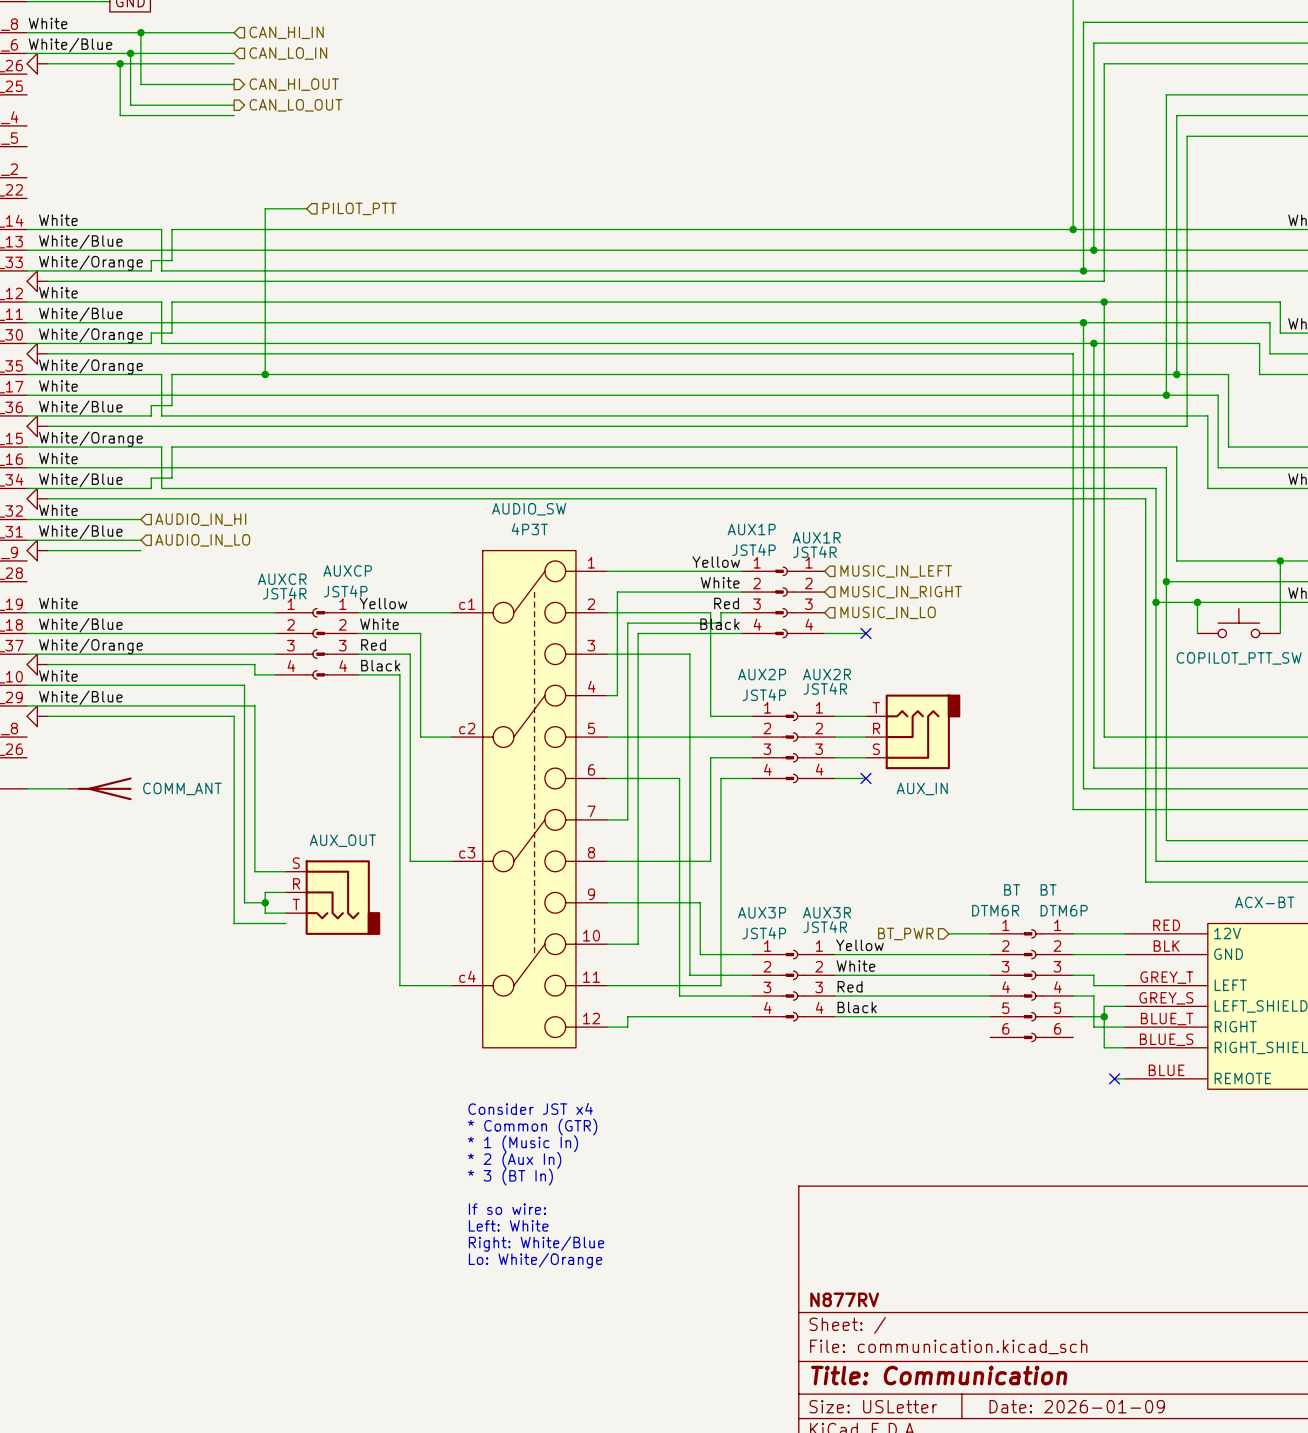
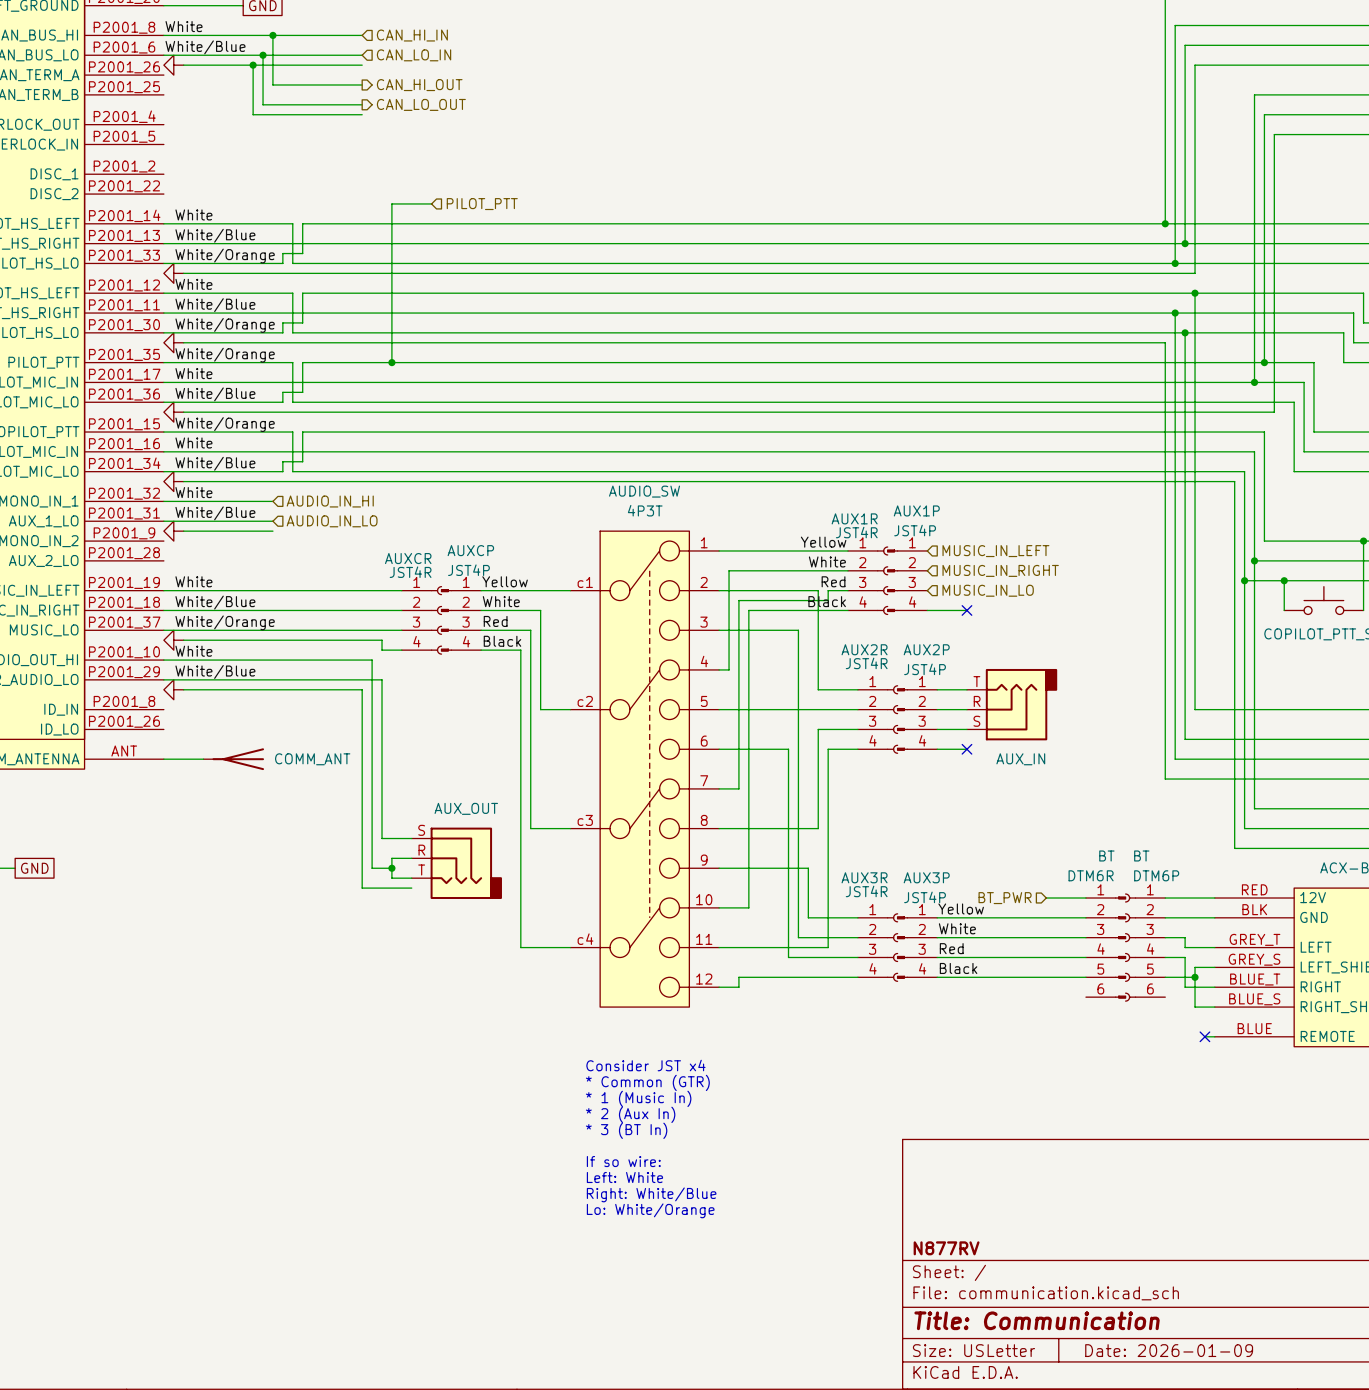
AUX1P position: (762, 602) -> (907, 580)
AUX1P flip: as is (777, 602) -> left-right (892, 580)
AUX1R flip: as is (788, 602) -> left-right (882, 580)
AUX2P position: (773, 747) -> (917, 719)
AUX2P flip: as is (788, 747) -> left-right (902, 719)
AUX2R flip: as is (798, 747) -> left-right (892, 719)
AUX3P position: (773, 985) -> (917, 947)
AUX3P flip: as is (788, 985) -> left-right (902, 947)
AUX3R flip: as is (798, 985) -> left-right (892, 947)

